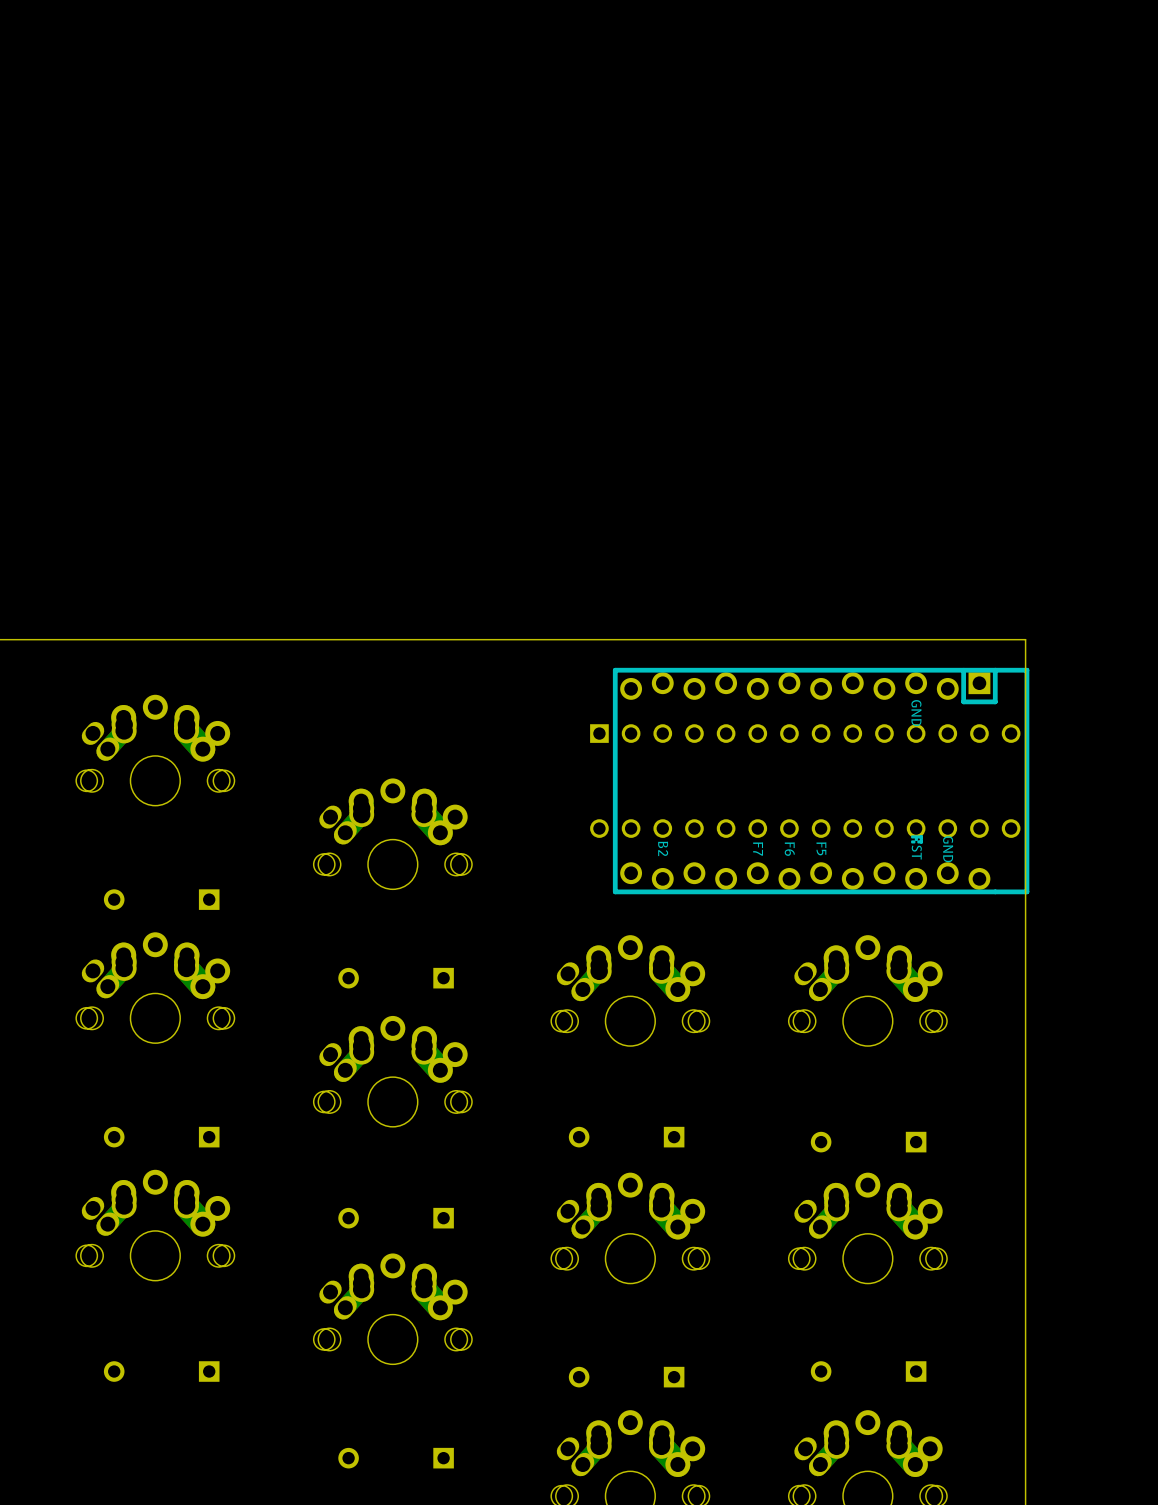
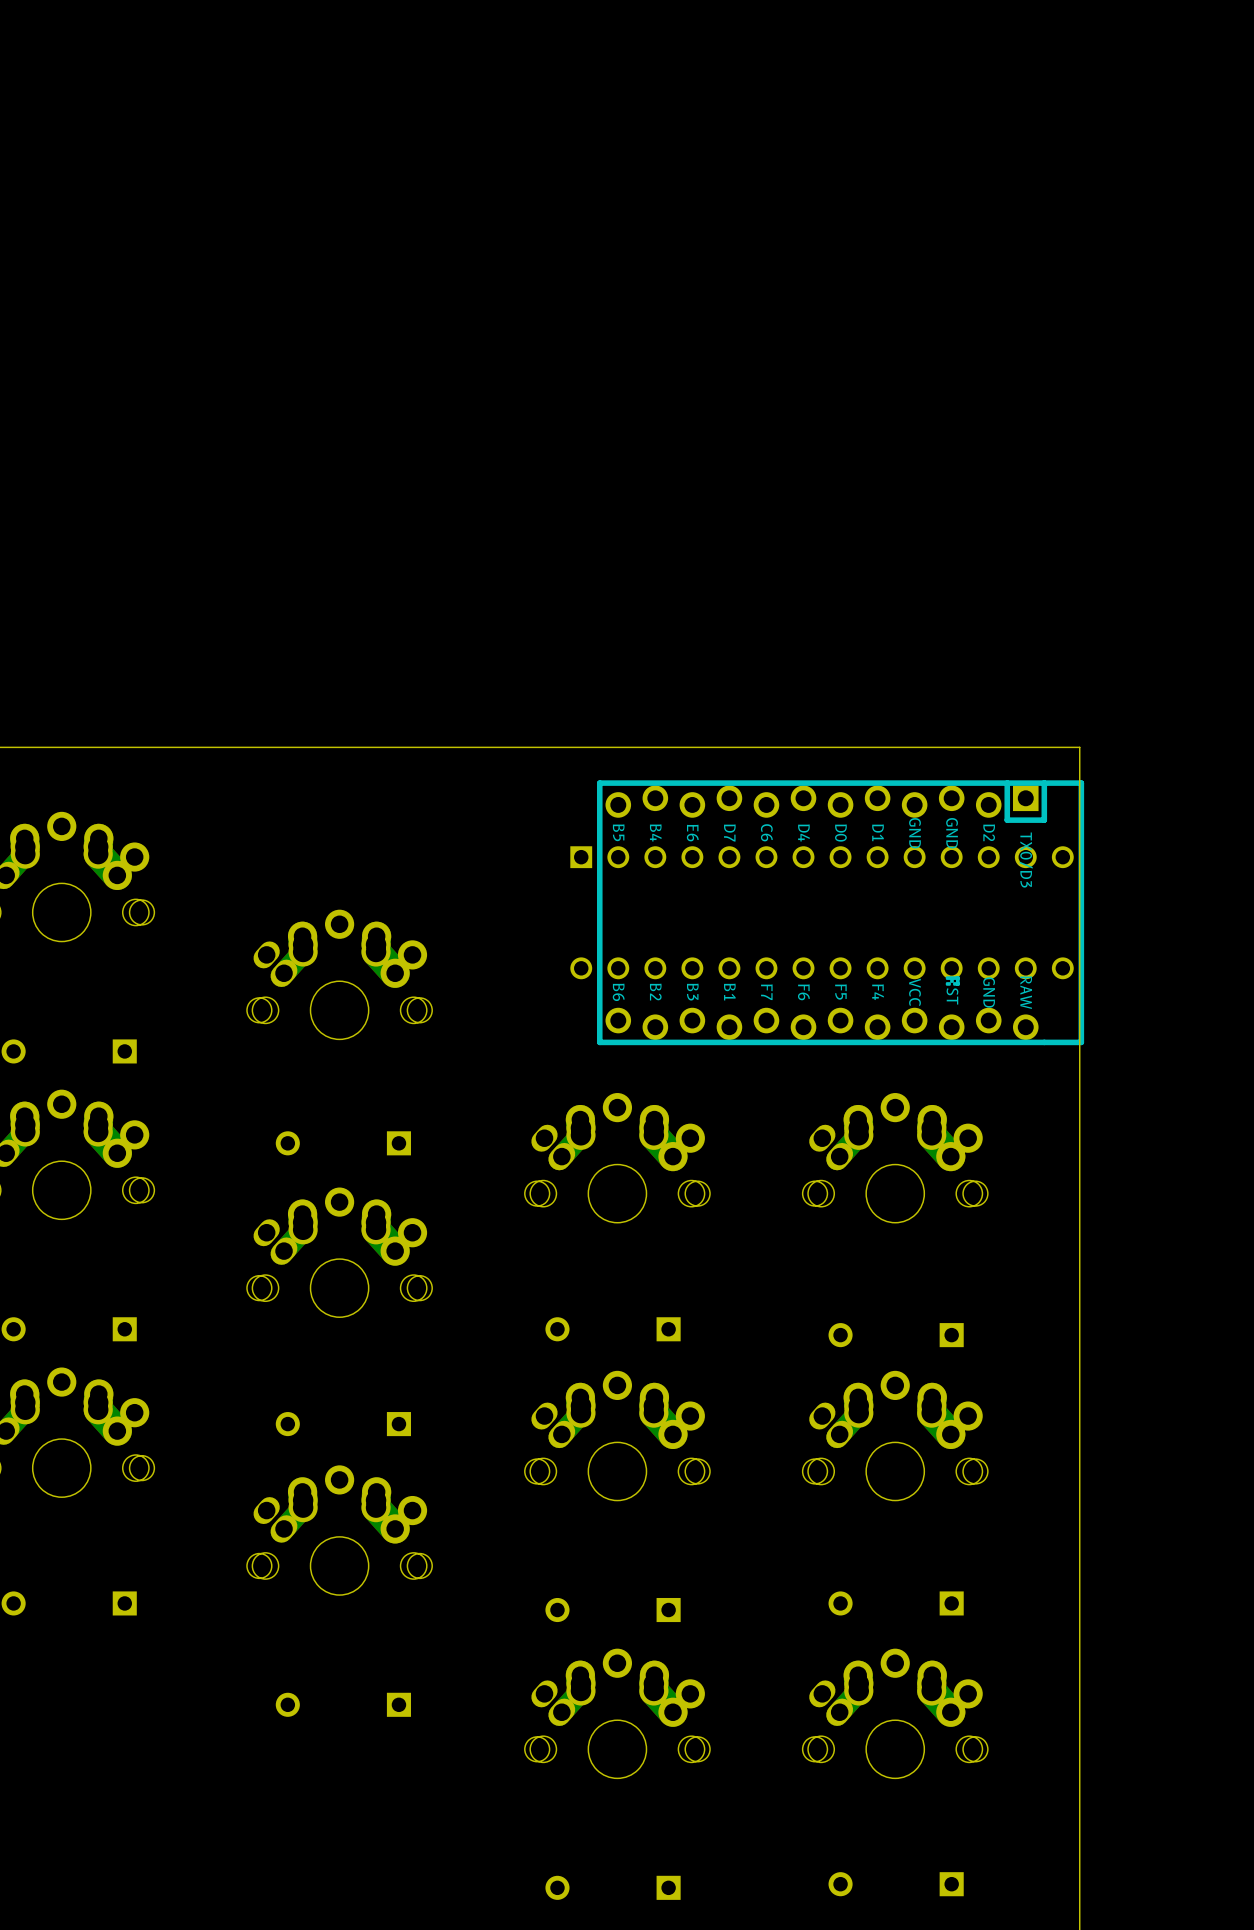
part footprint: [612, 667, 1030, 895] -> [596, 780, 1085, 1046]

